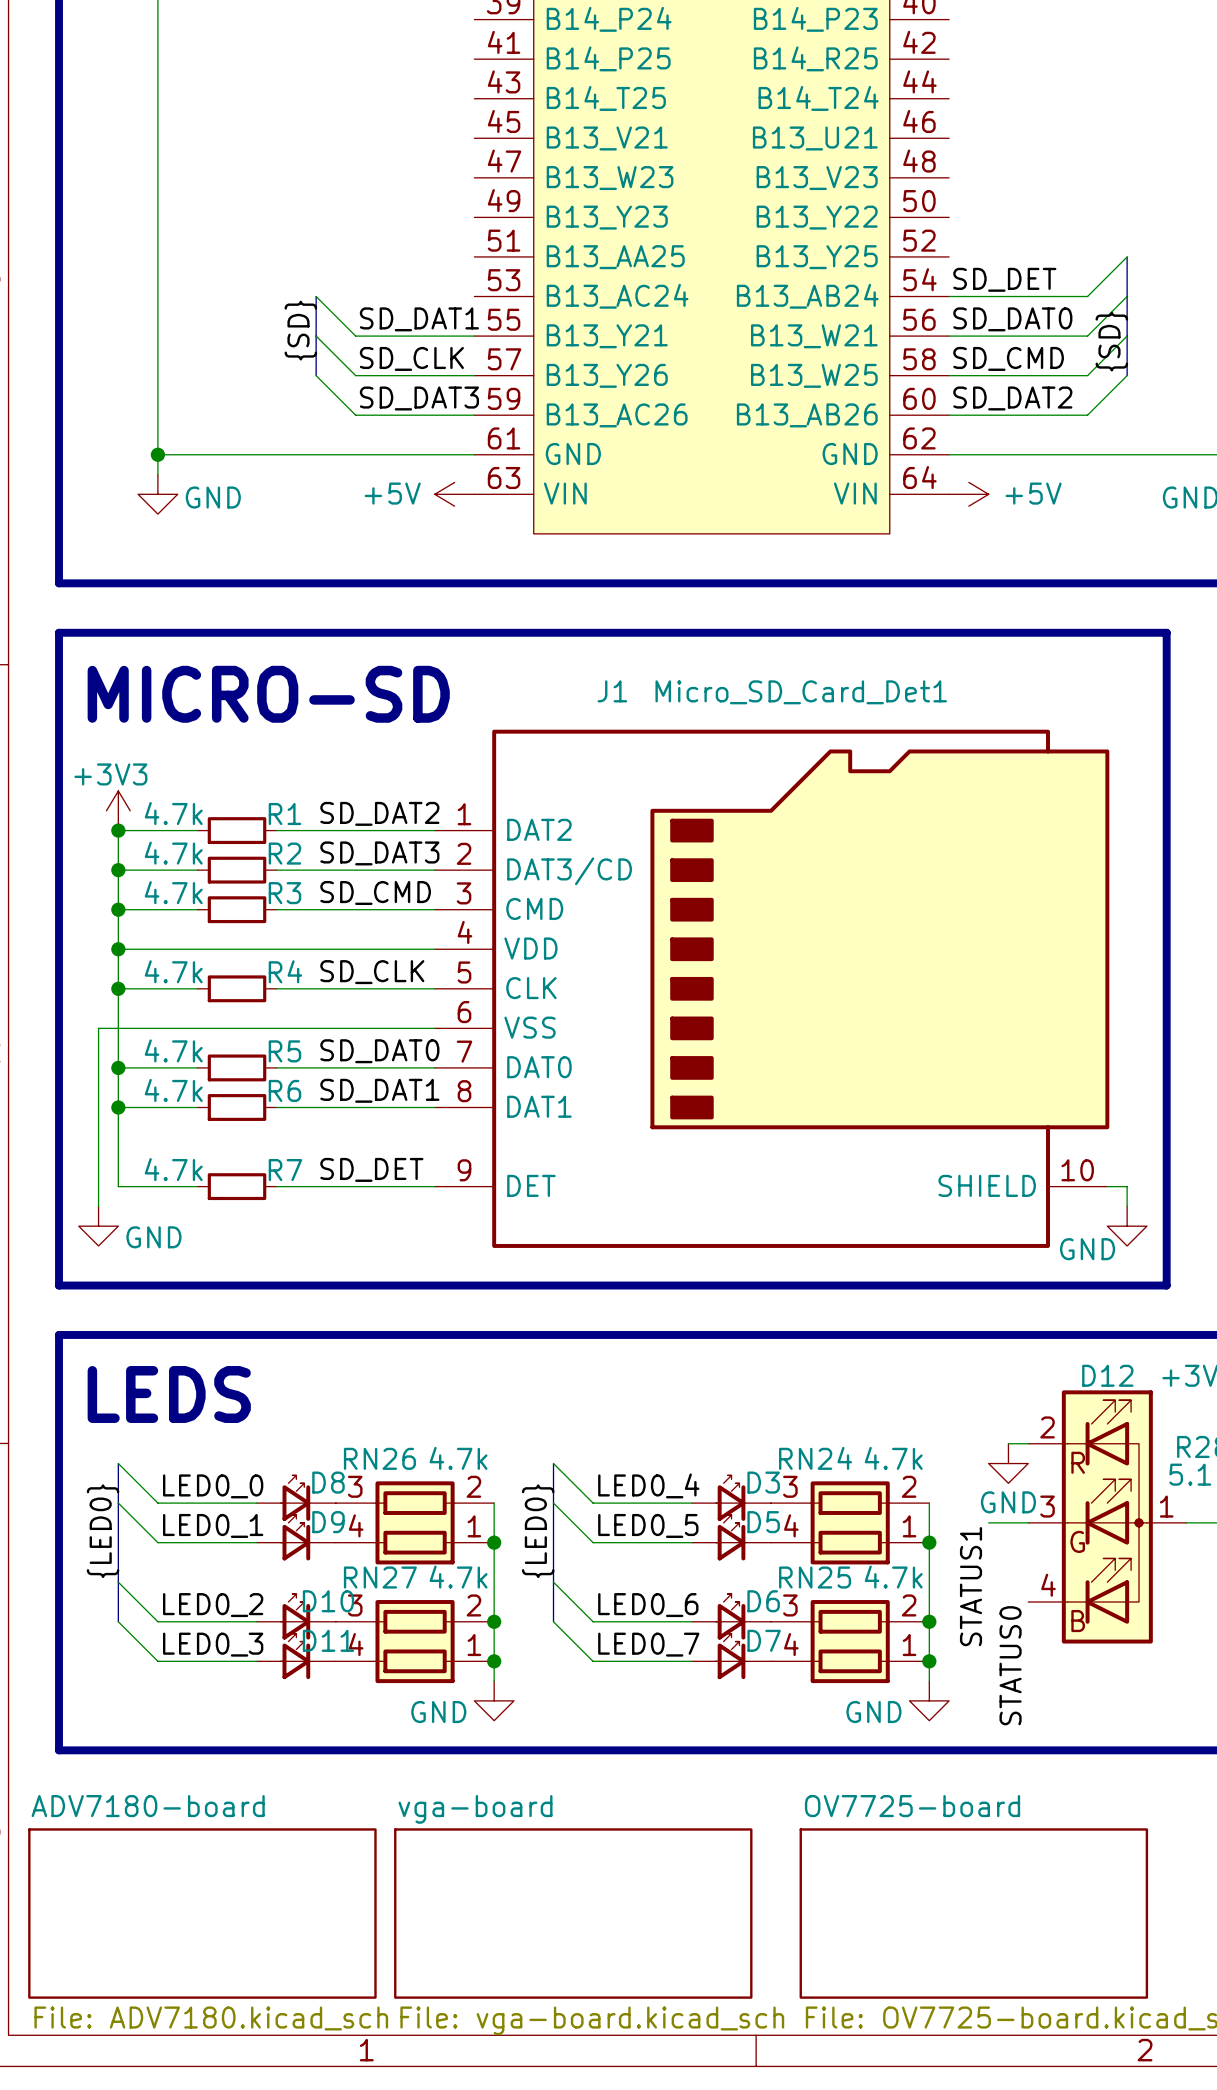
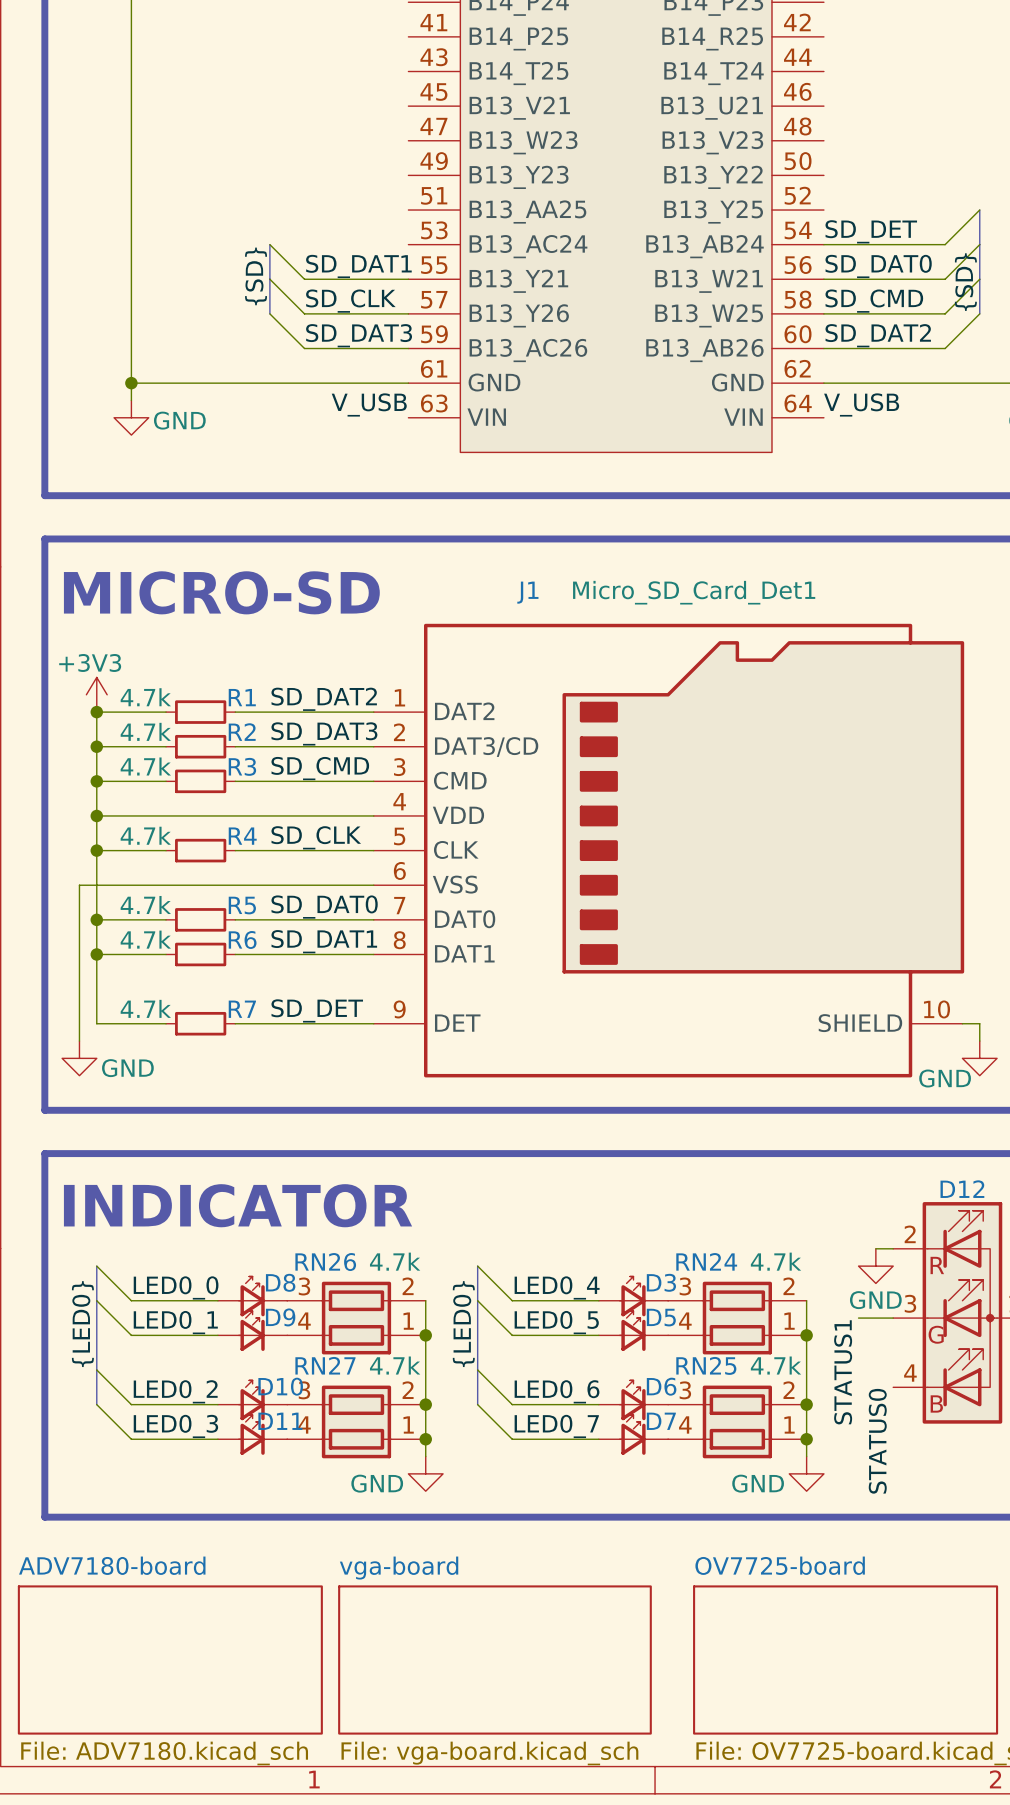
label: none -> V_USB (369, 404)
label: none -> V_USB (861, 404)
power symbol: +5V (454, 494) -> none
power symbol: +5V (968, 494) -> none
text: LEDS (169, 1394) -> INDICATOR (238, 1205)

